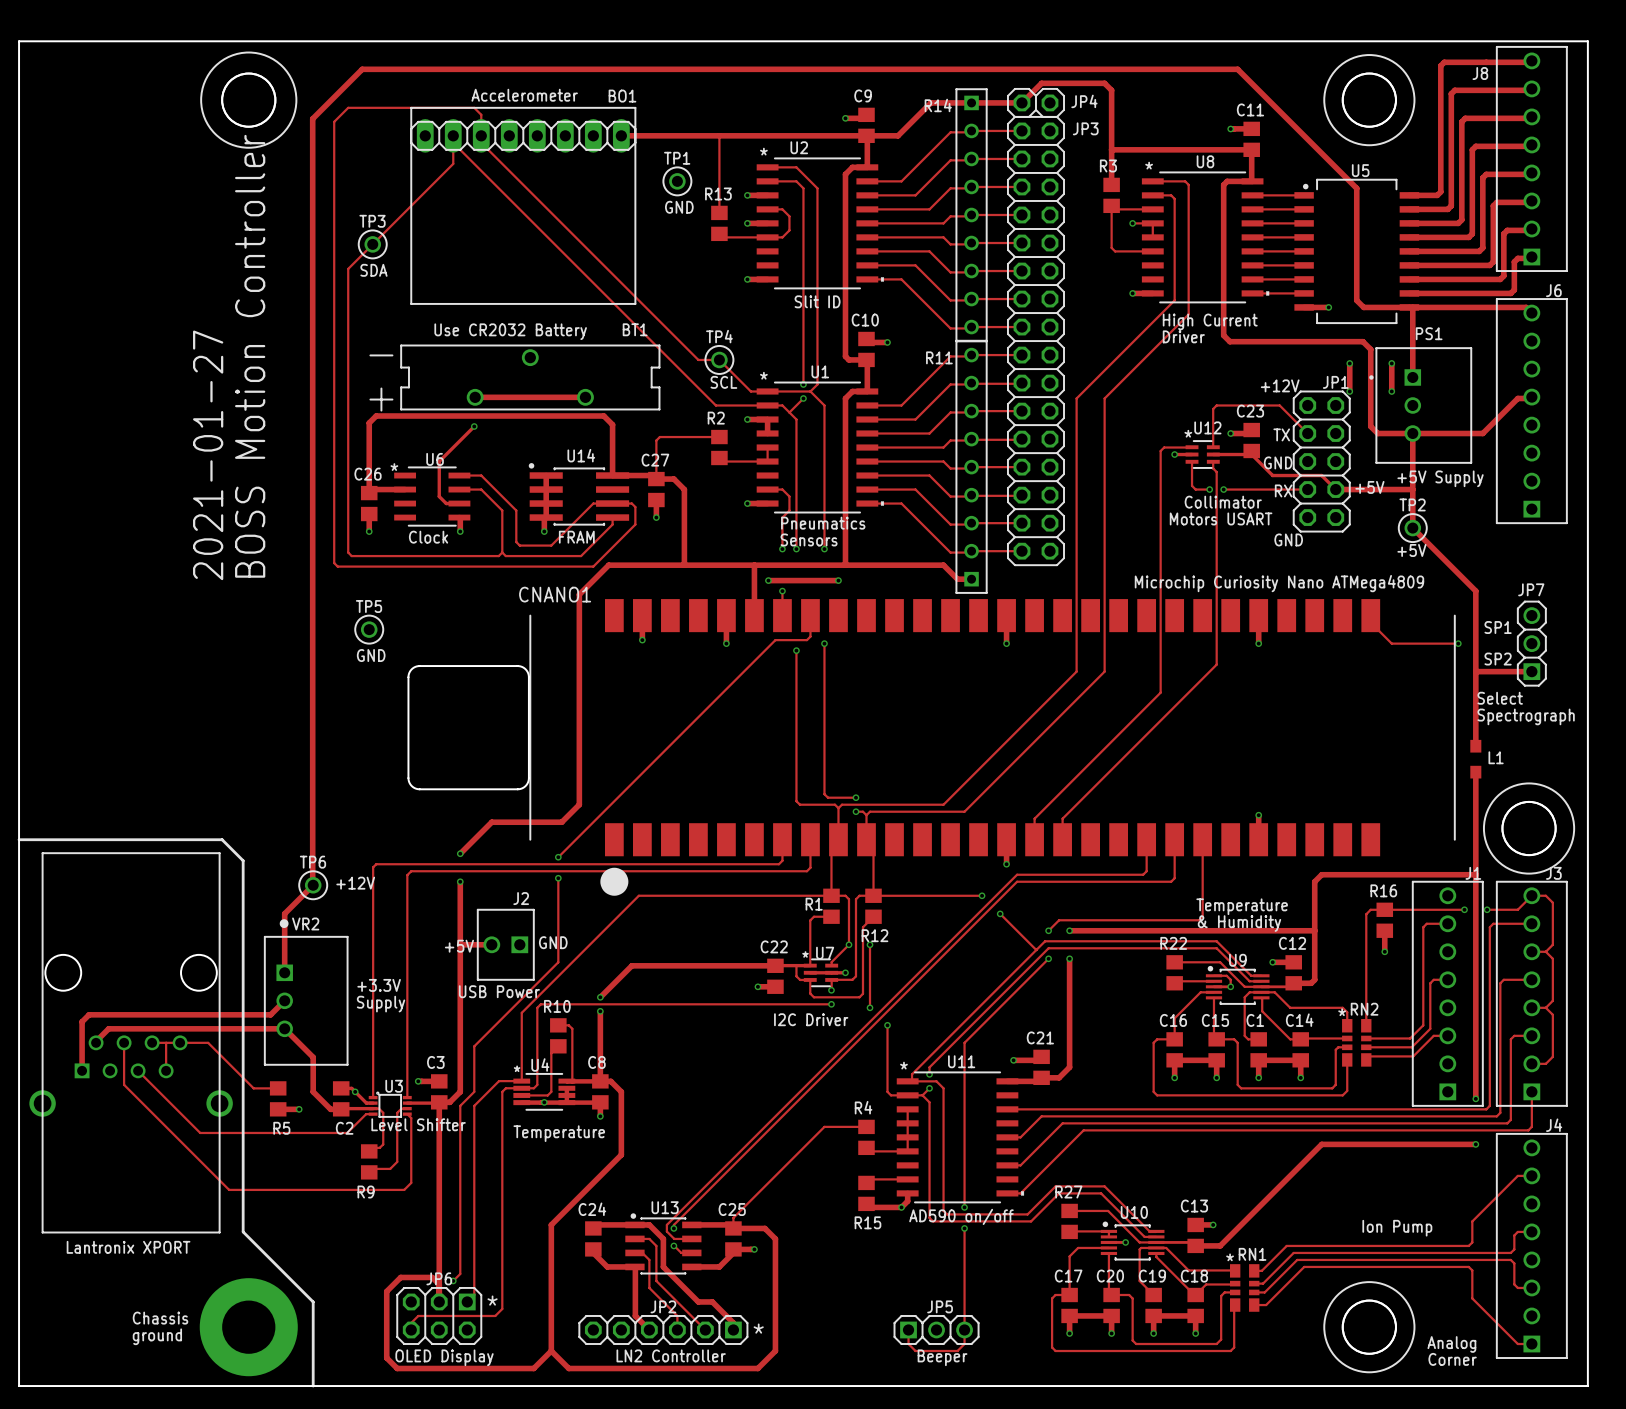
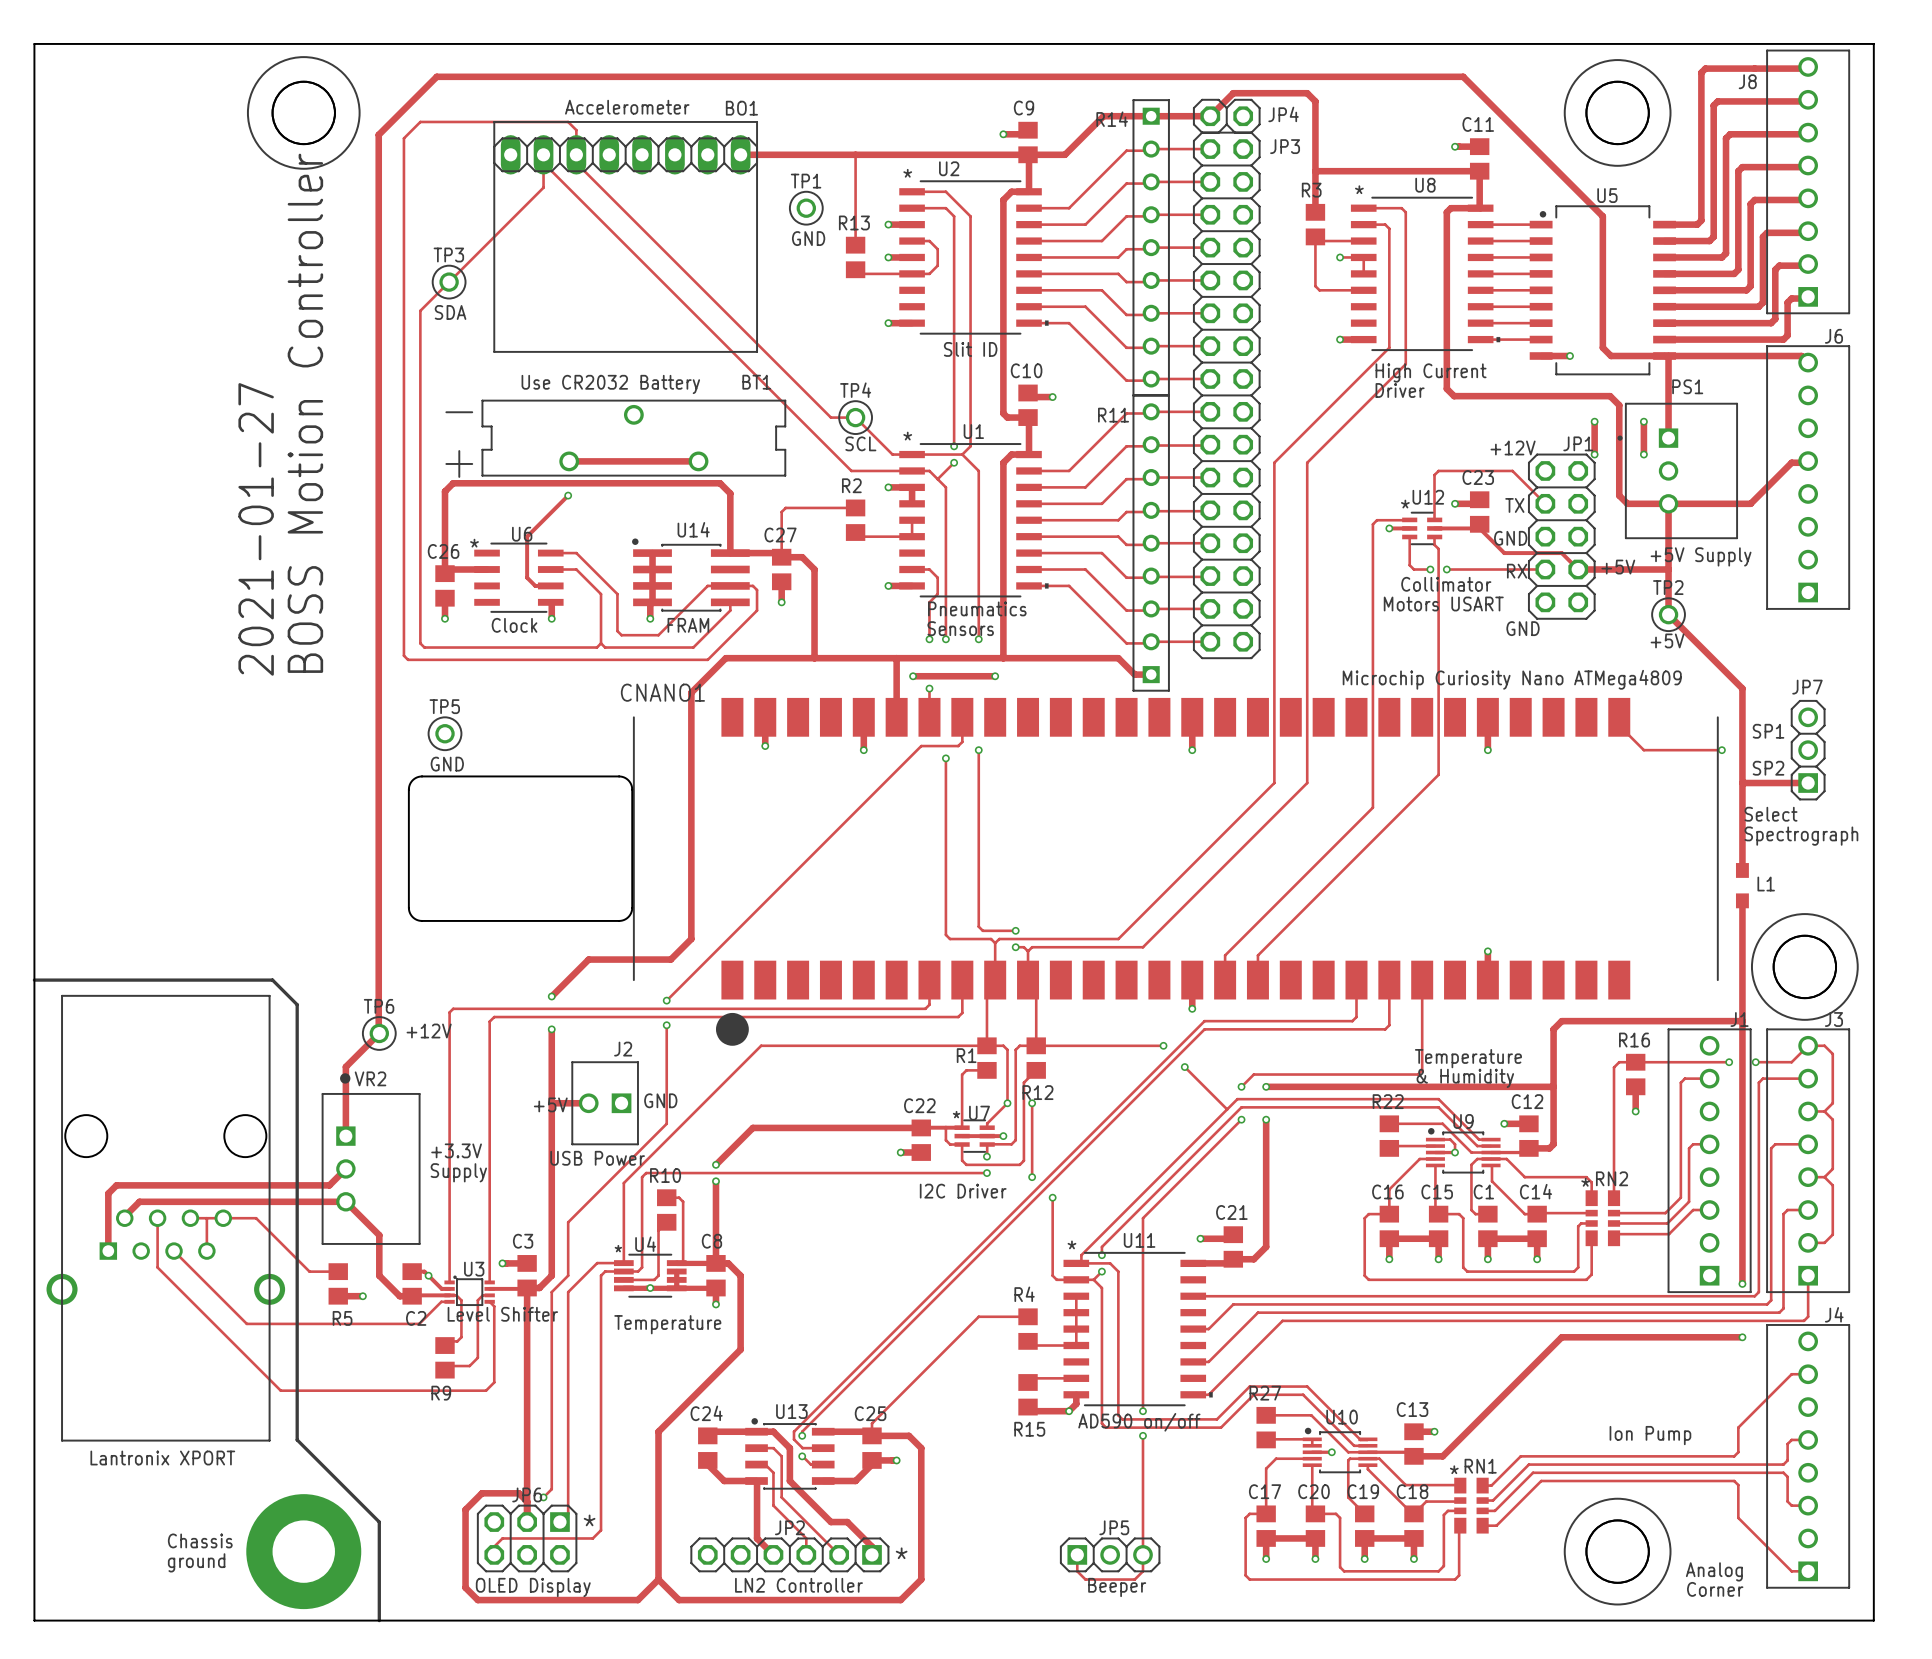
board edge: (419, 666) (411, 669) (408, 677) (408, 779) (411, 786) (419, 789) -> (504, 776) (420, 776) (412, 780) (408, 789) (408, 907) (411, 915) (422, 920) (504, 920)

